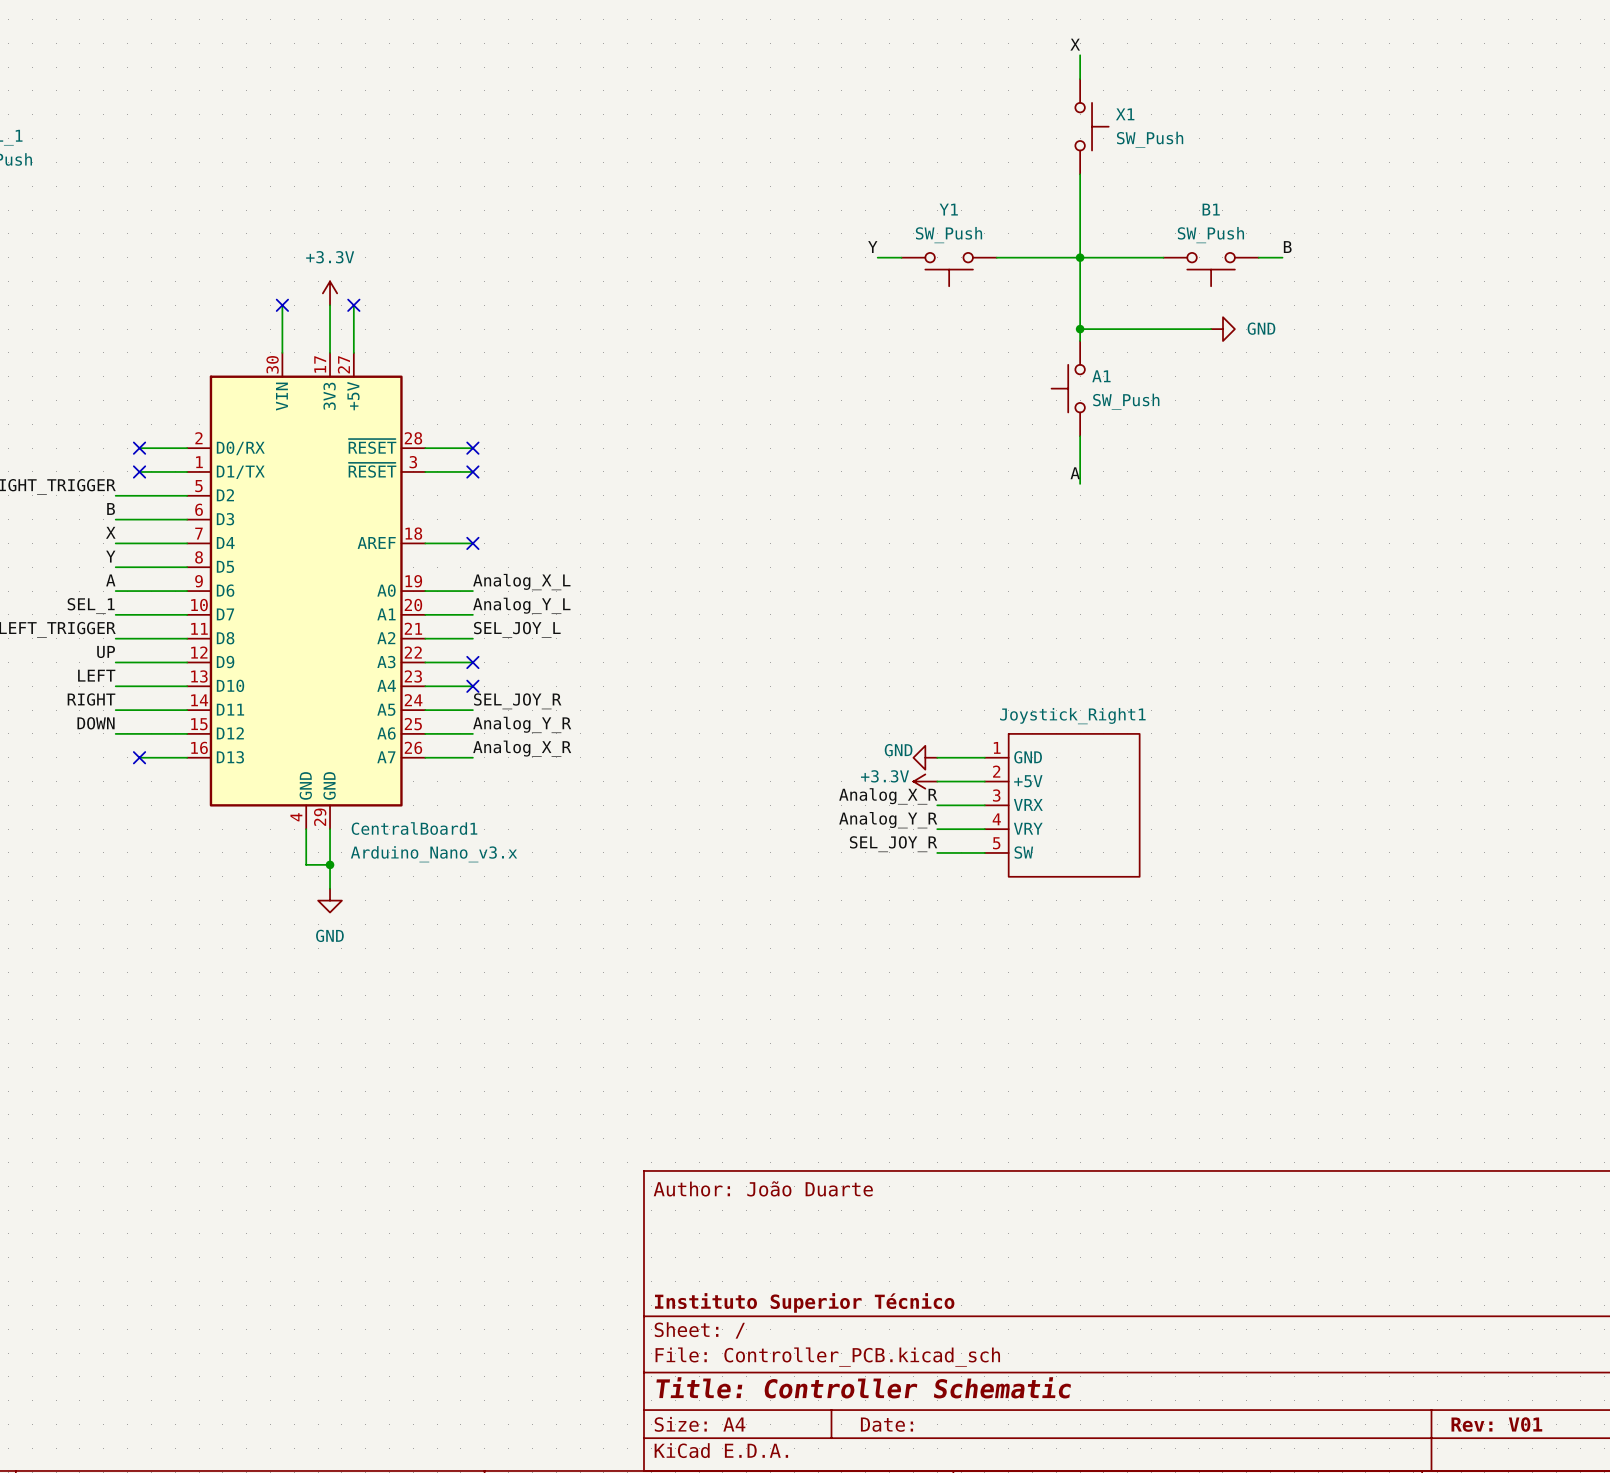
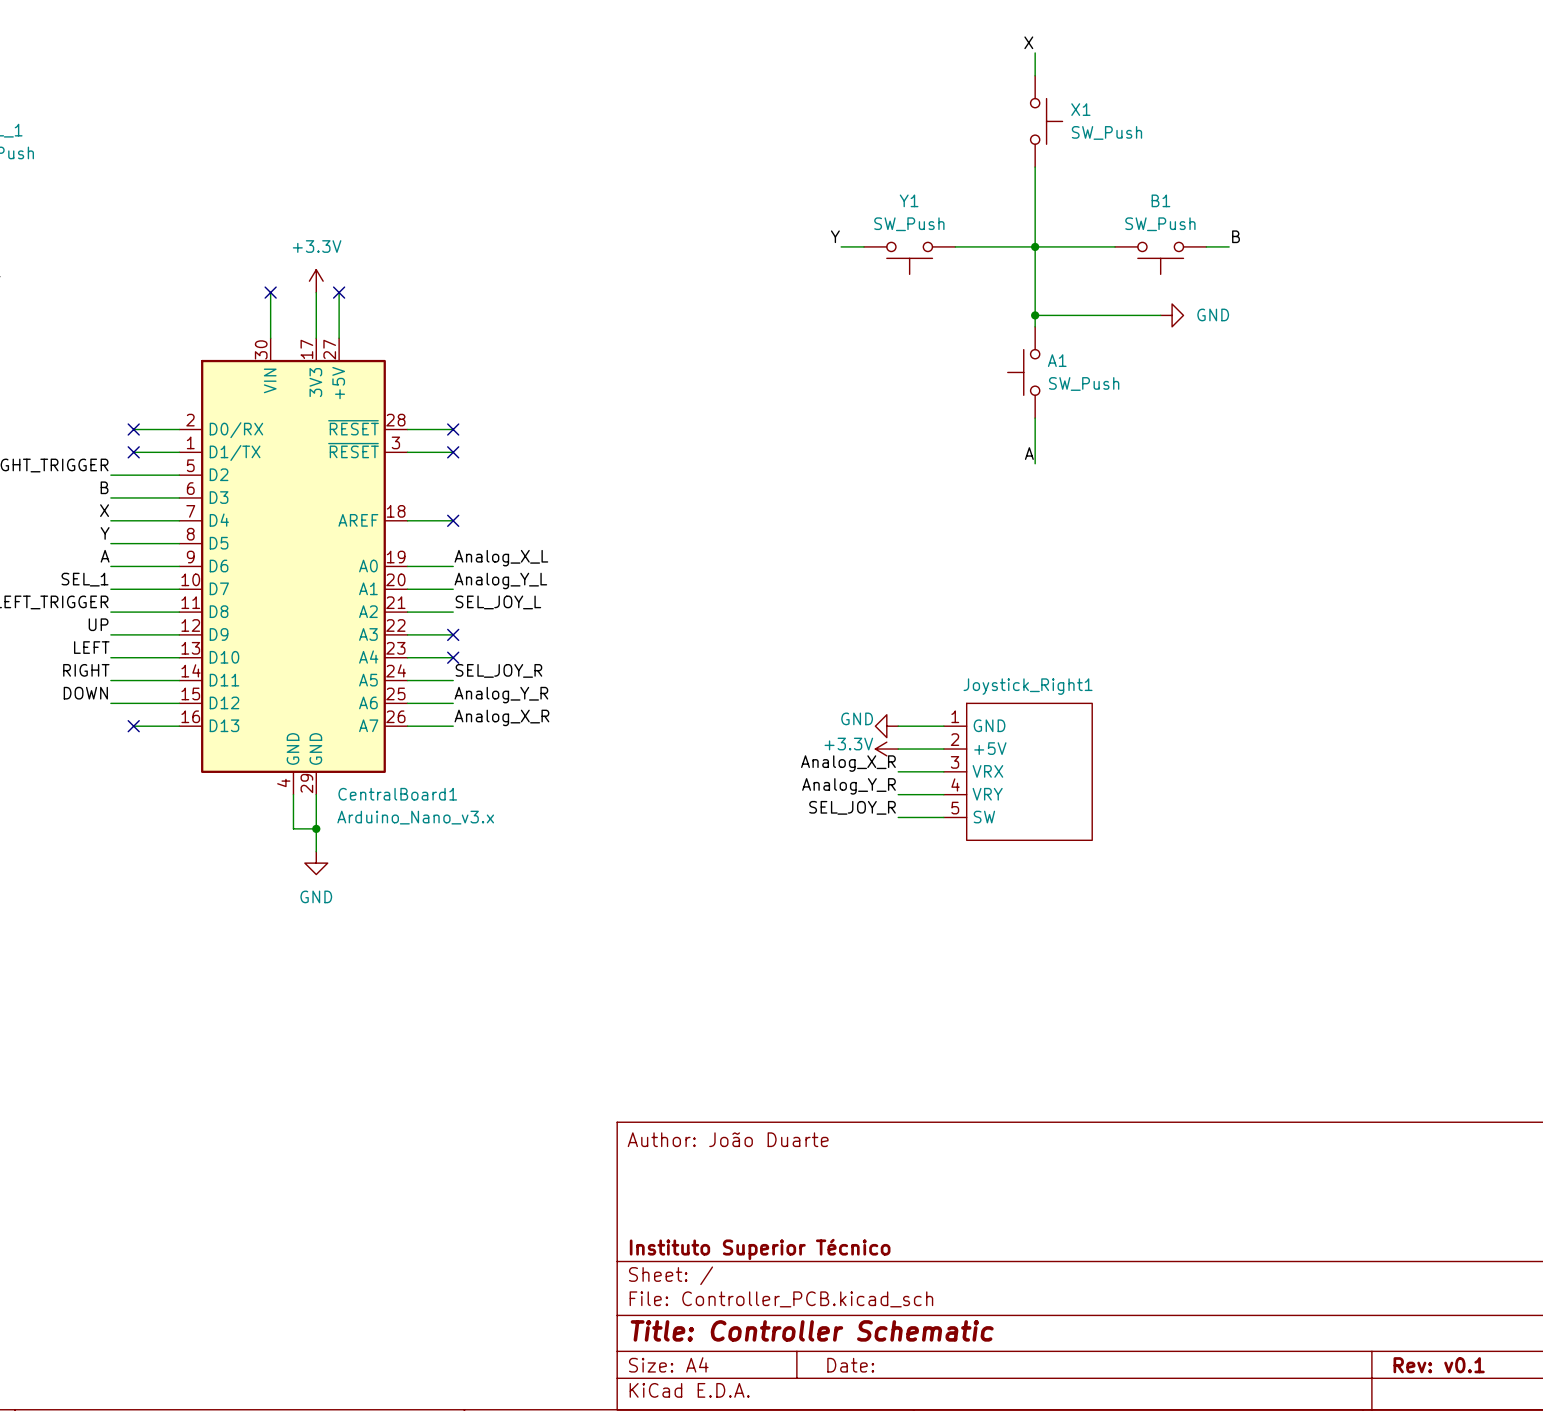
title block: Rev: V01 (1496, 1424) -> Rev: v0.1 (1439, 1365)

